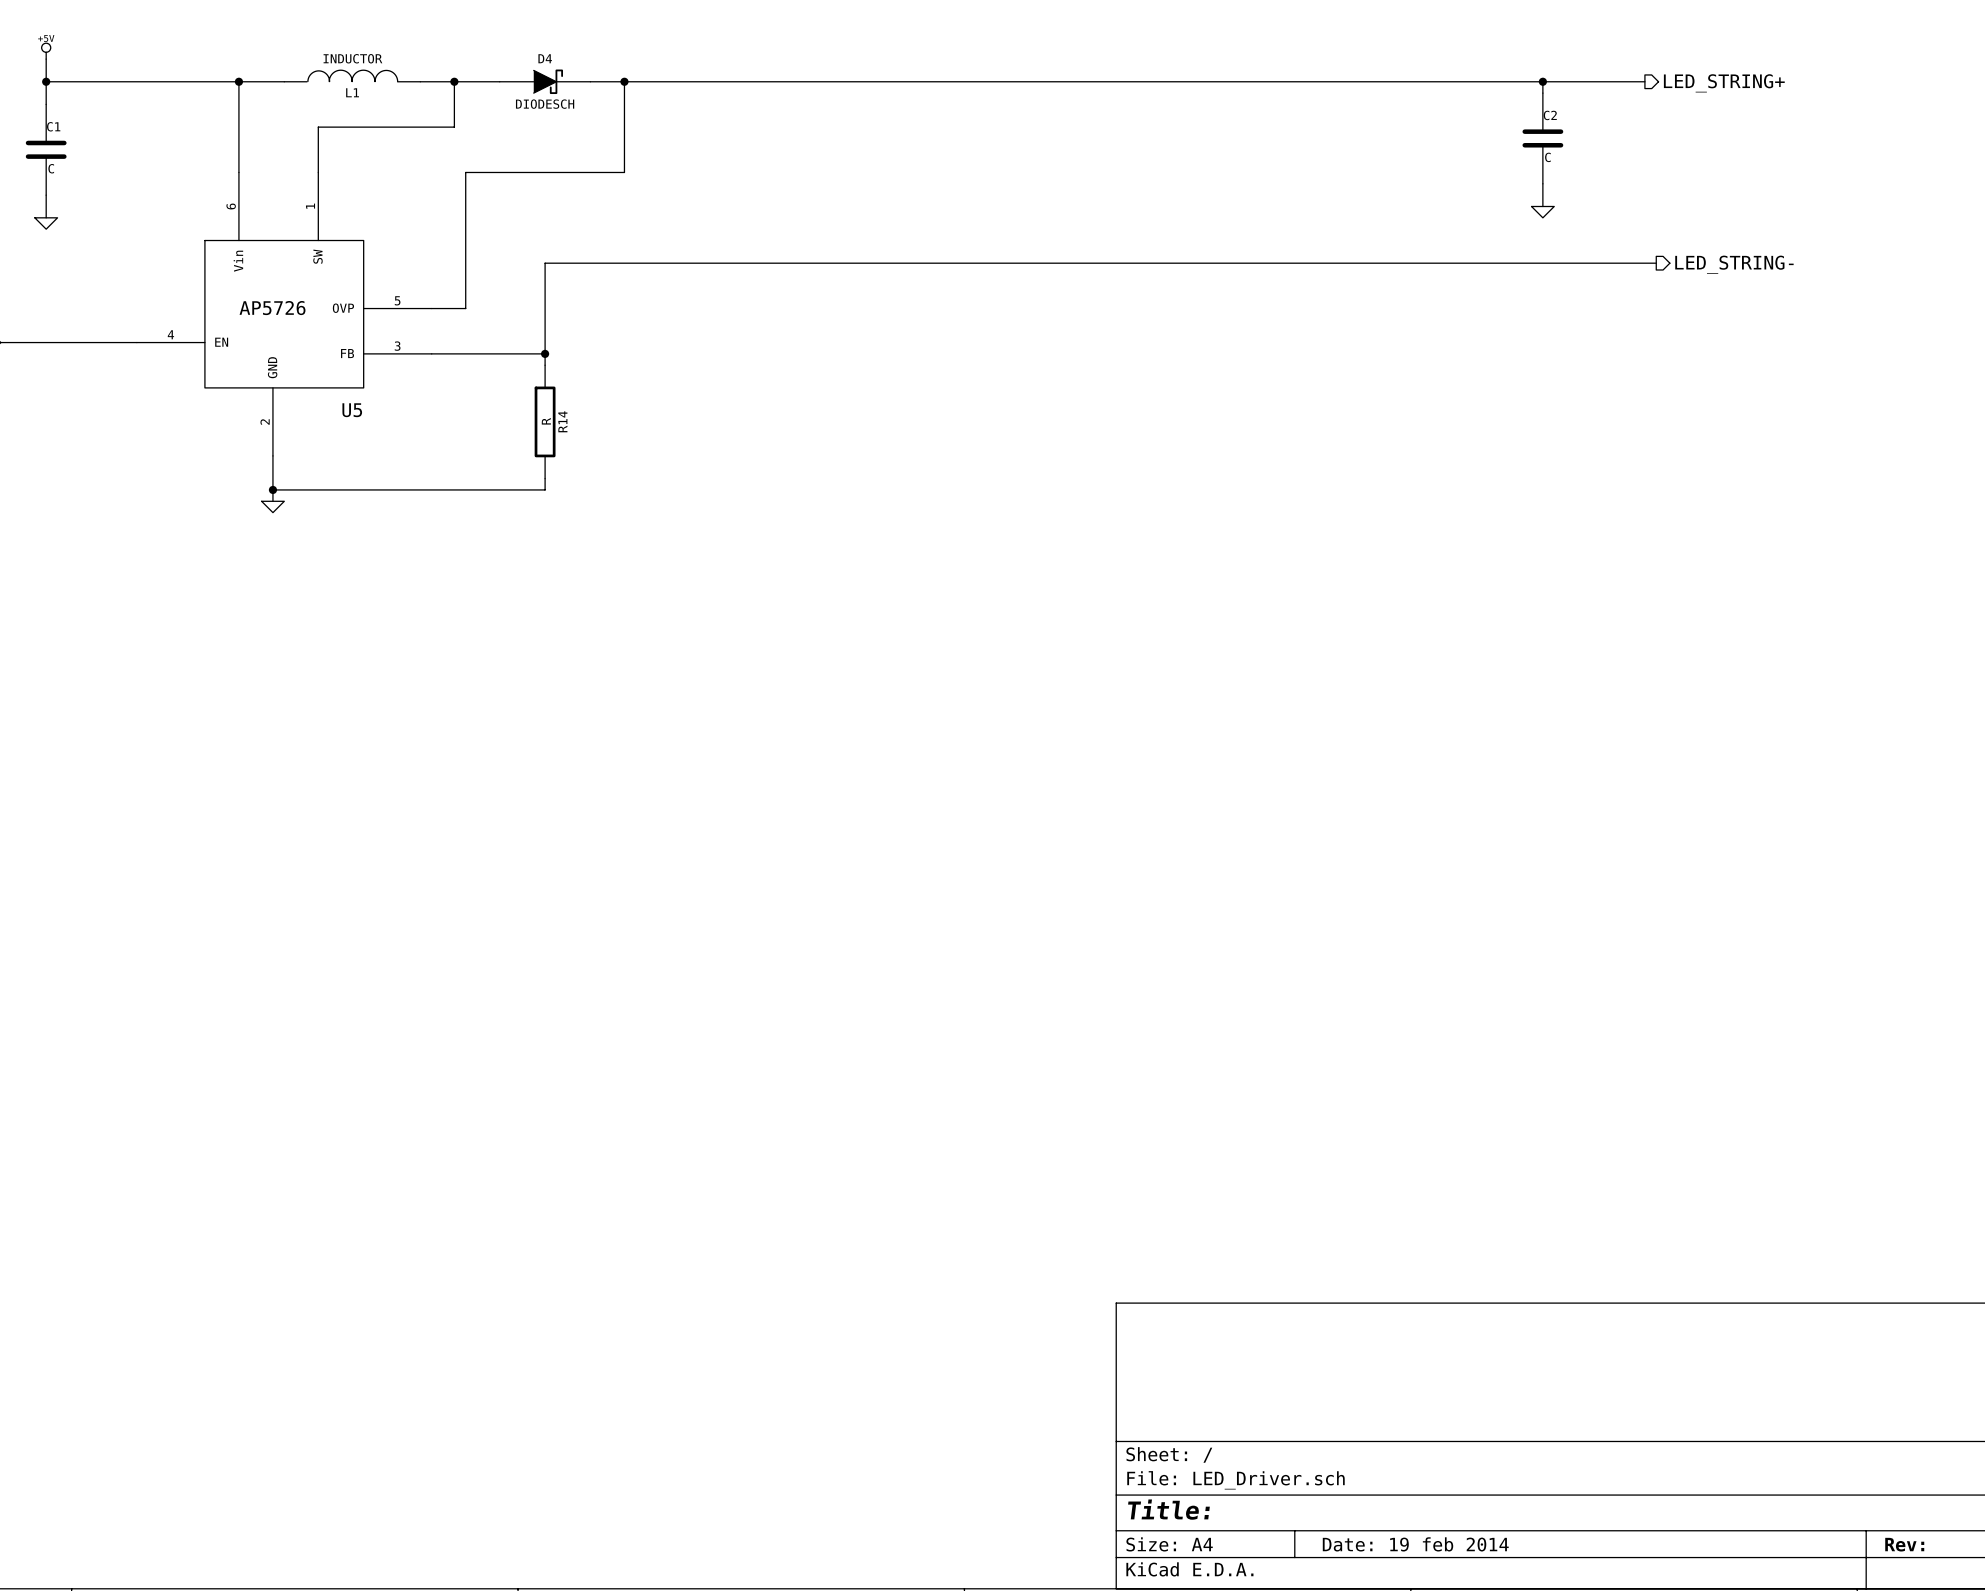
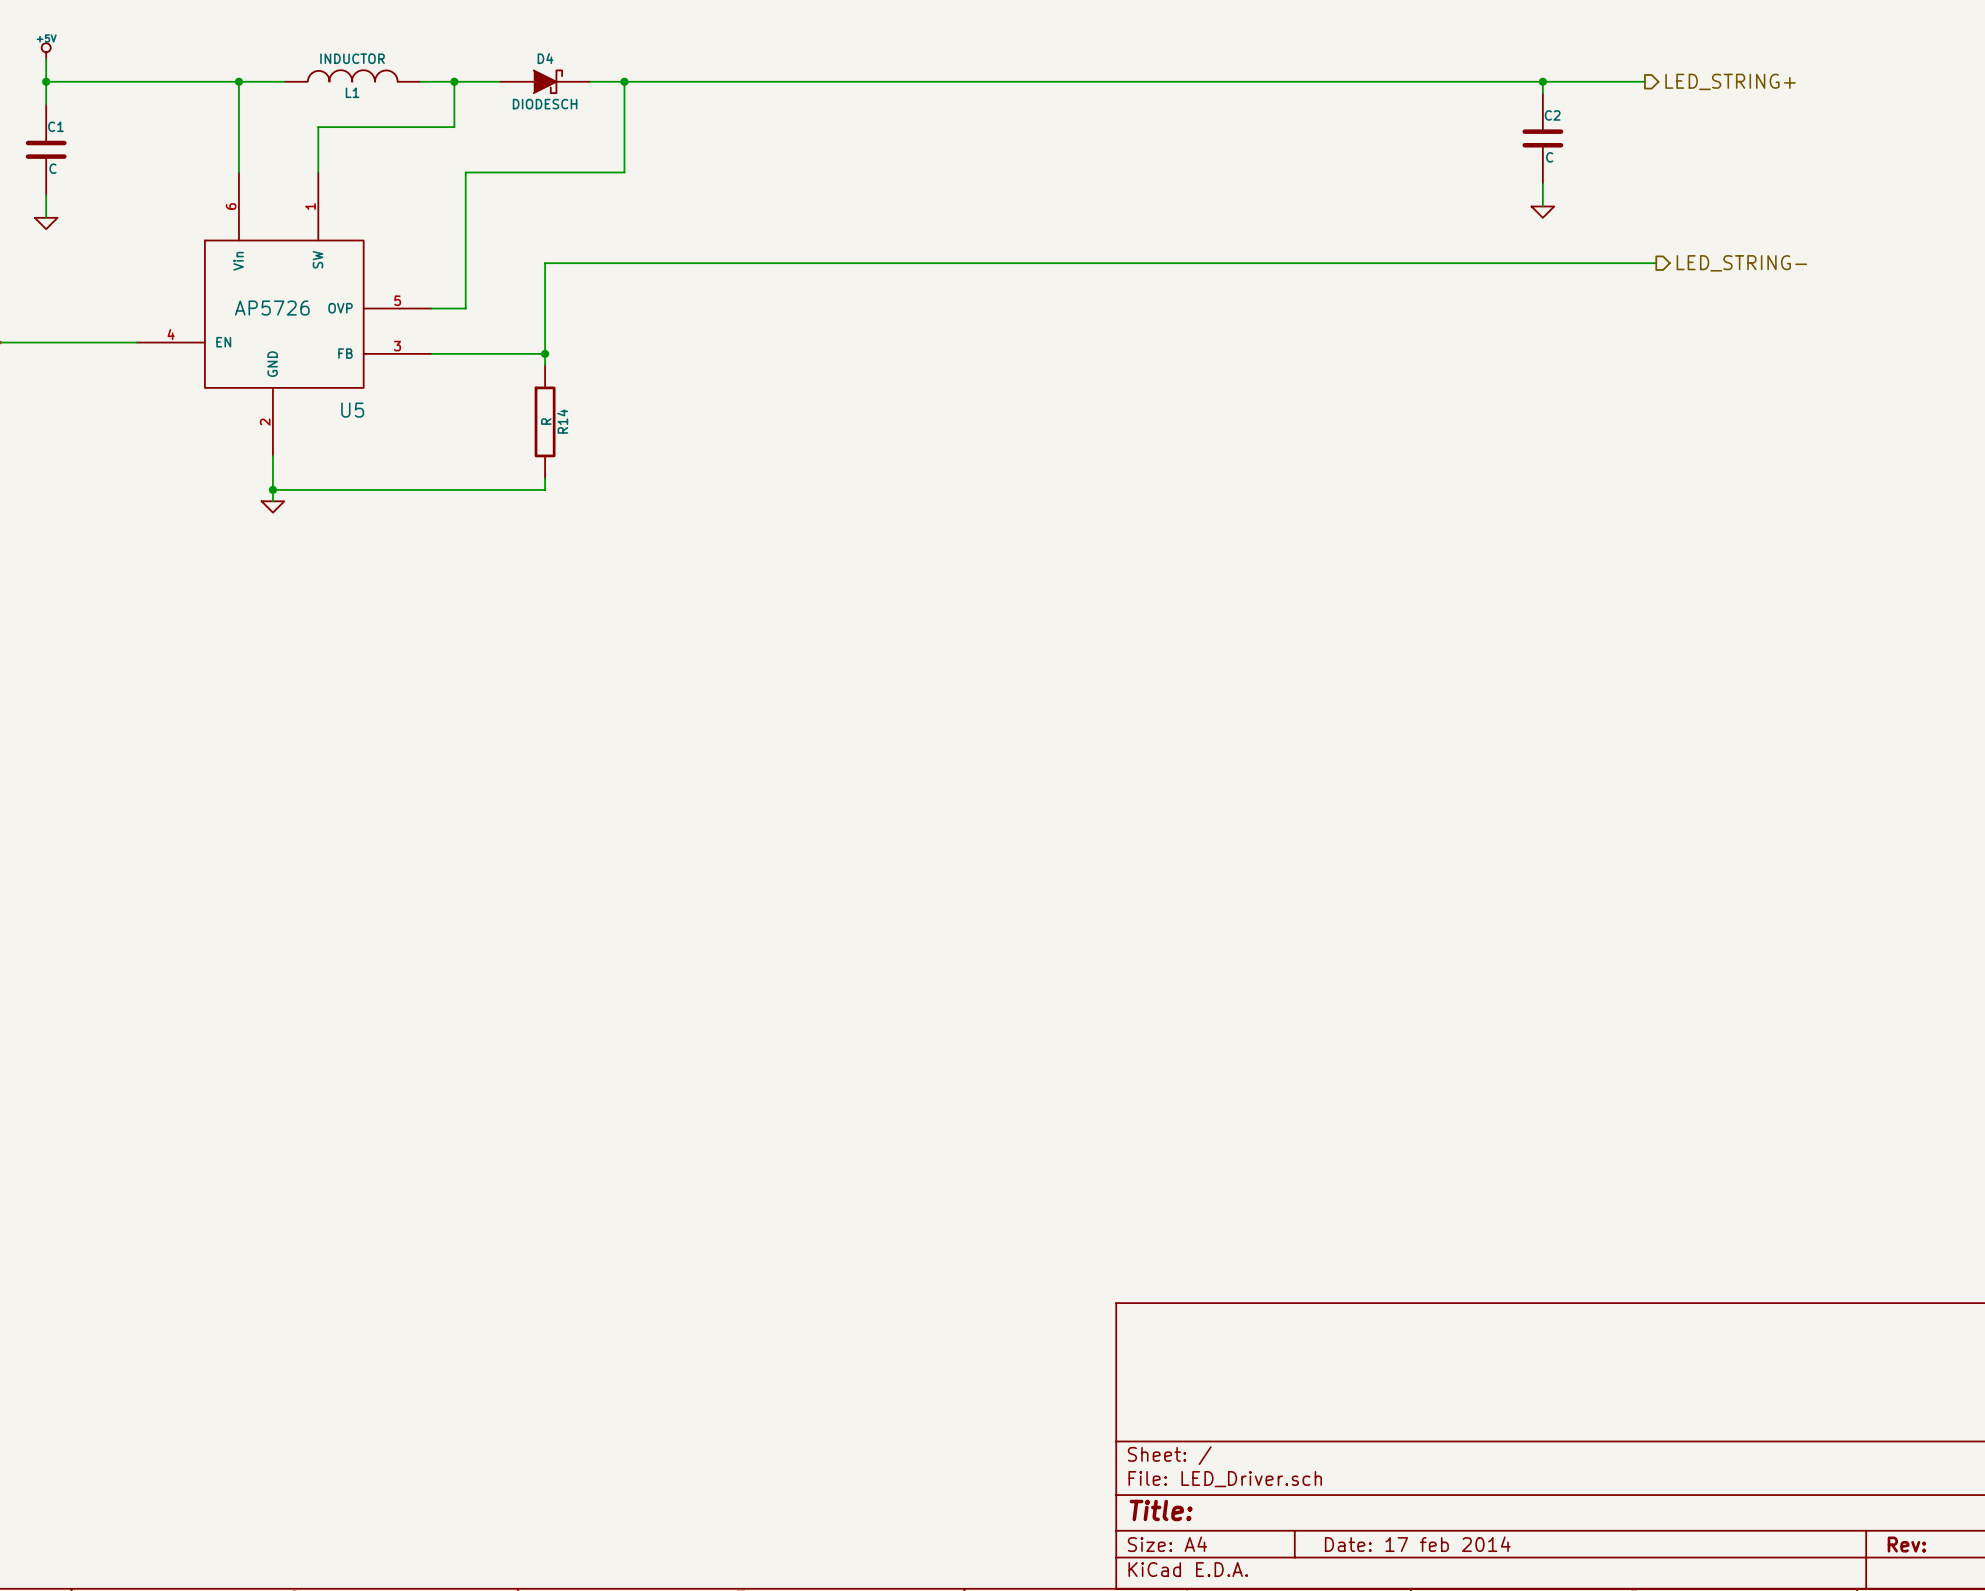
title block: Date: 19 feb 2014 (1415, 1544) -> Date: 17 feb 2014 (1417, 1544)

